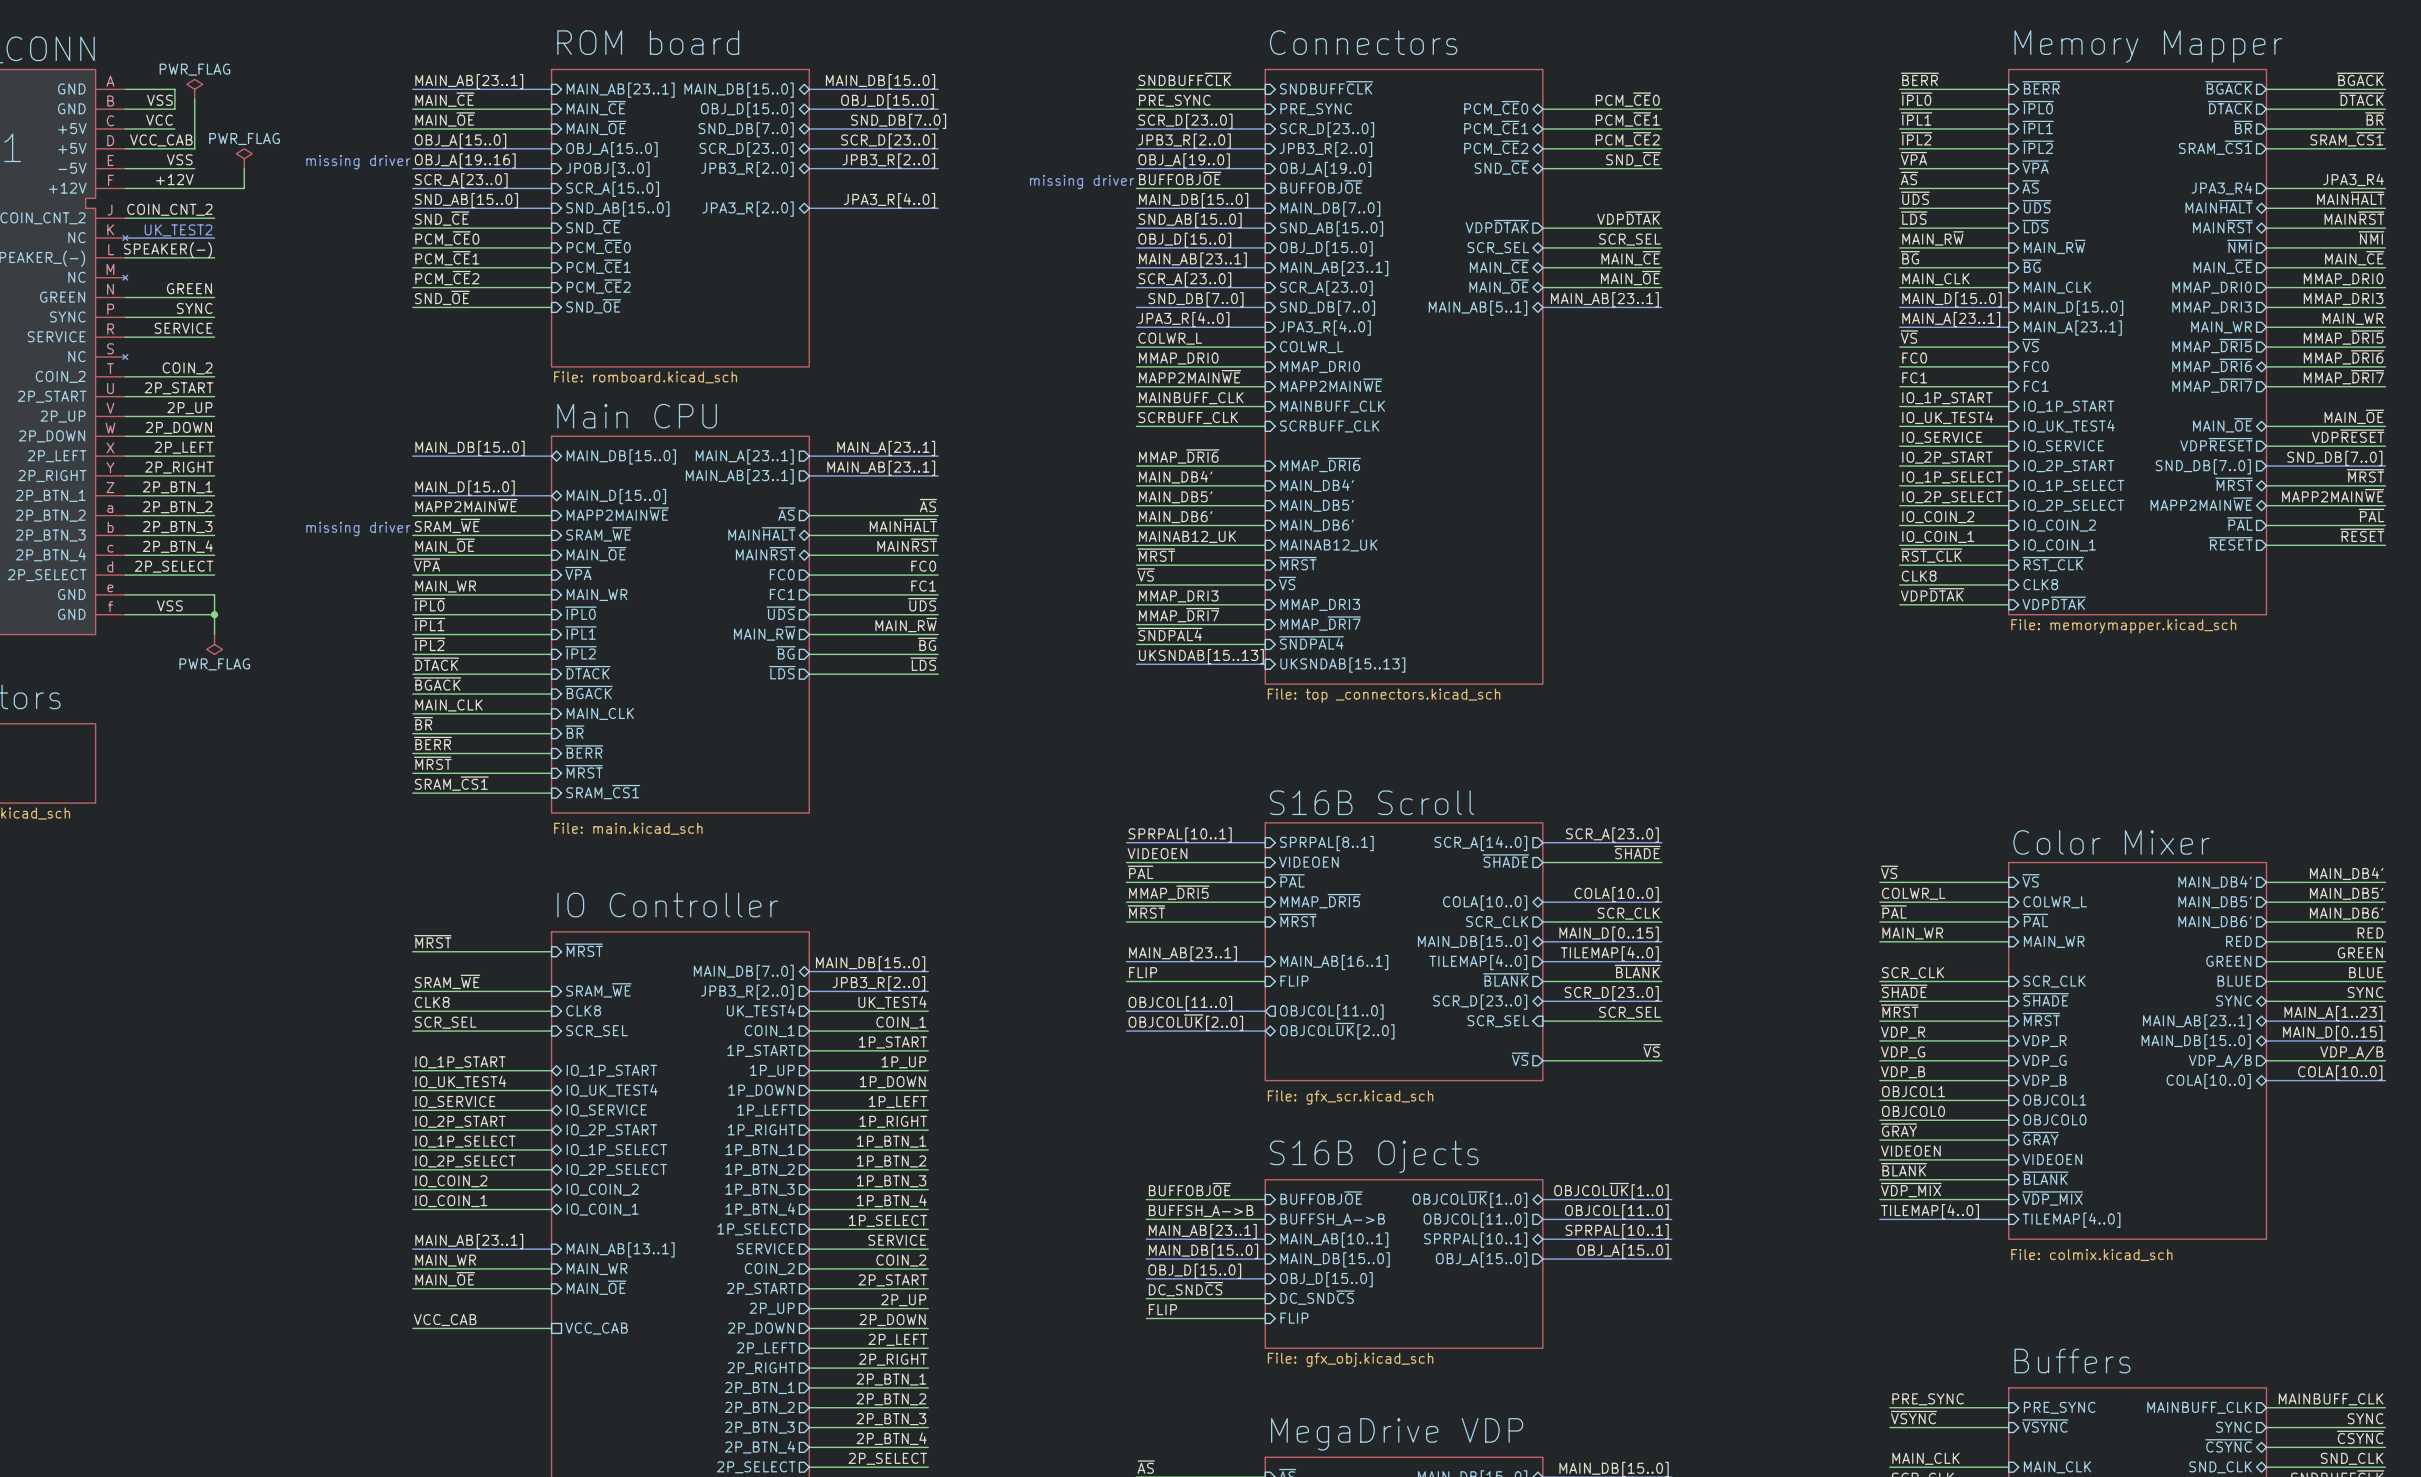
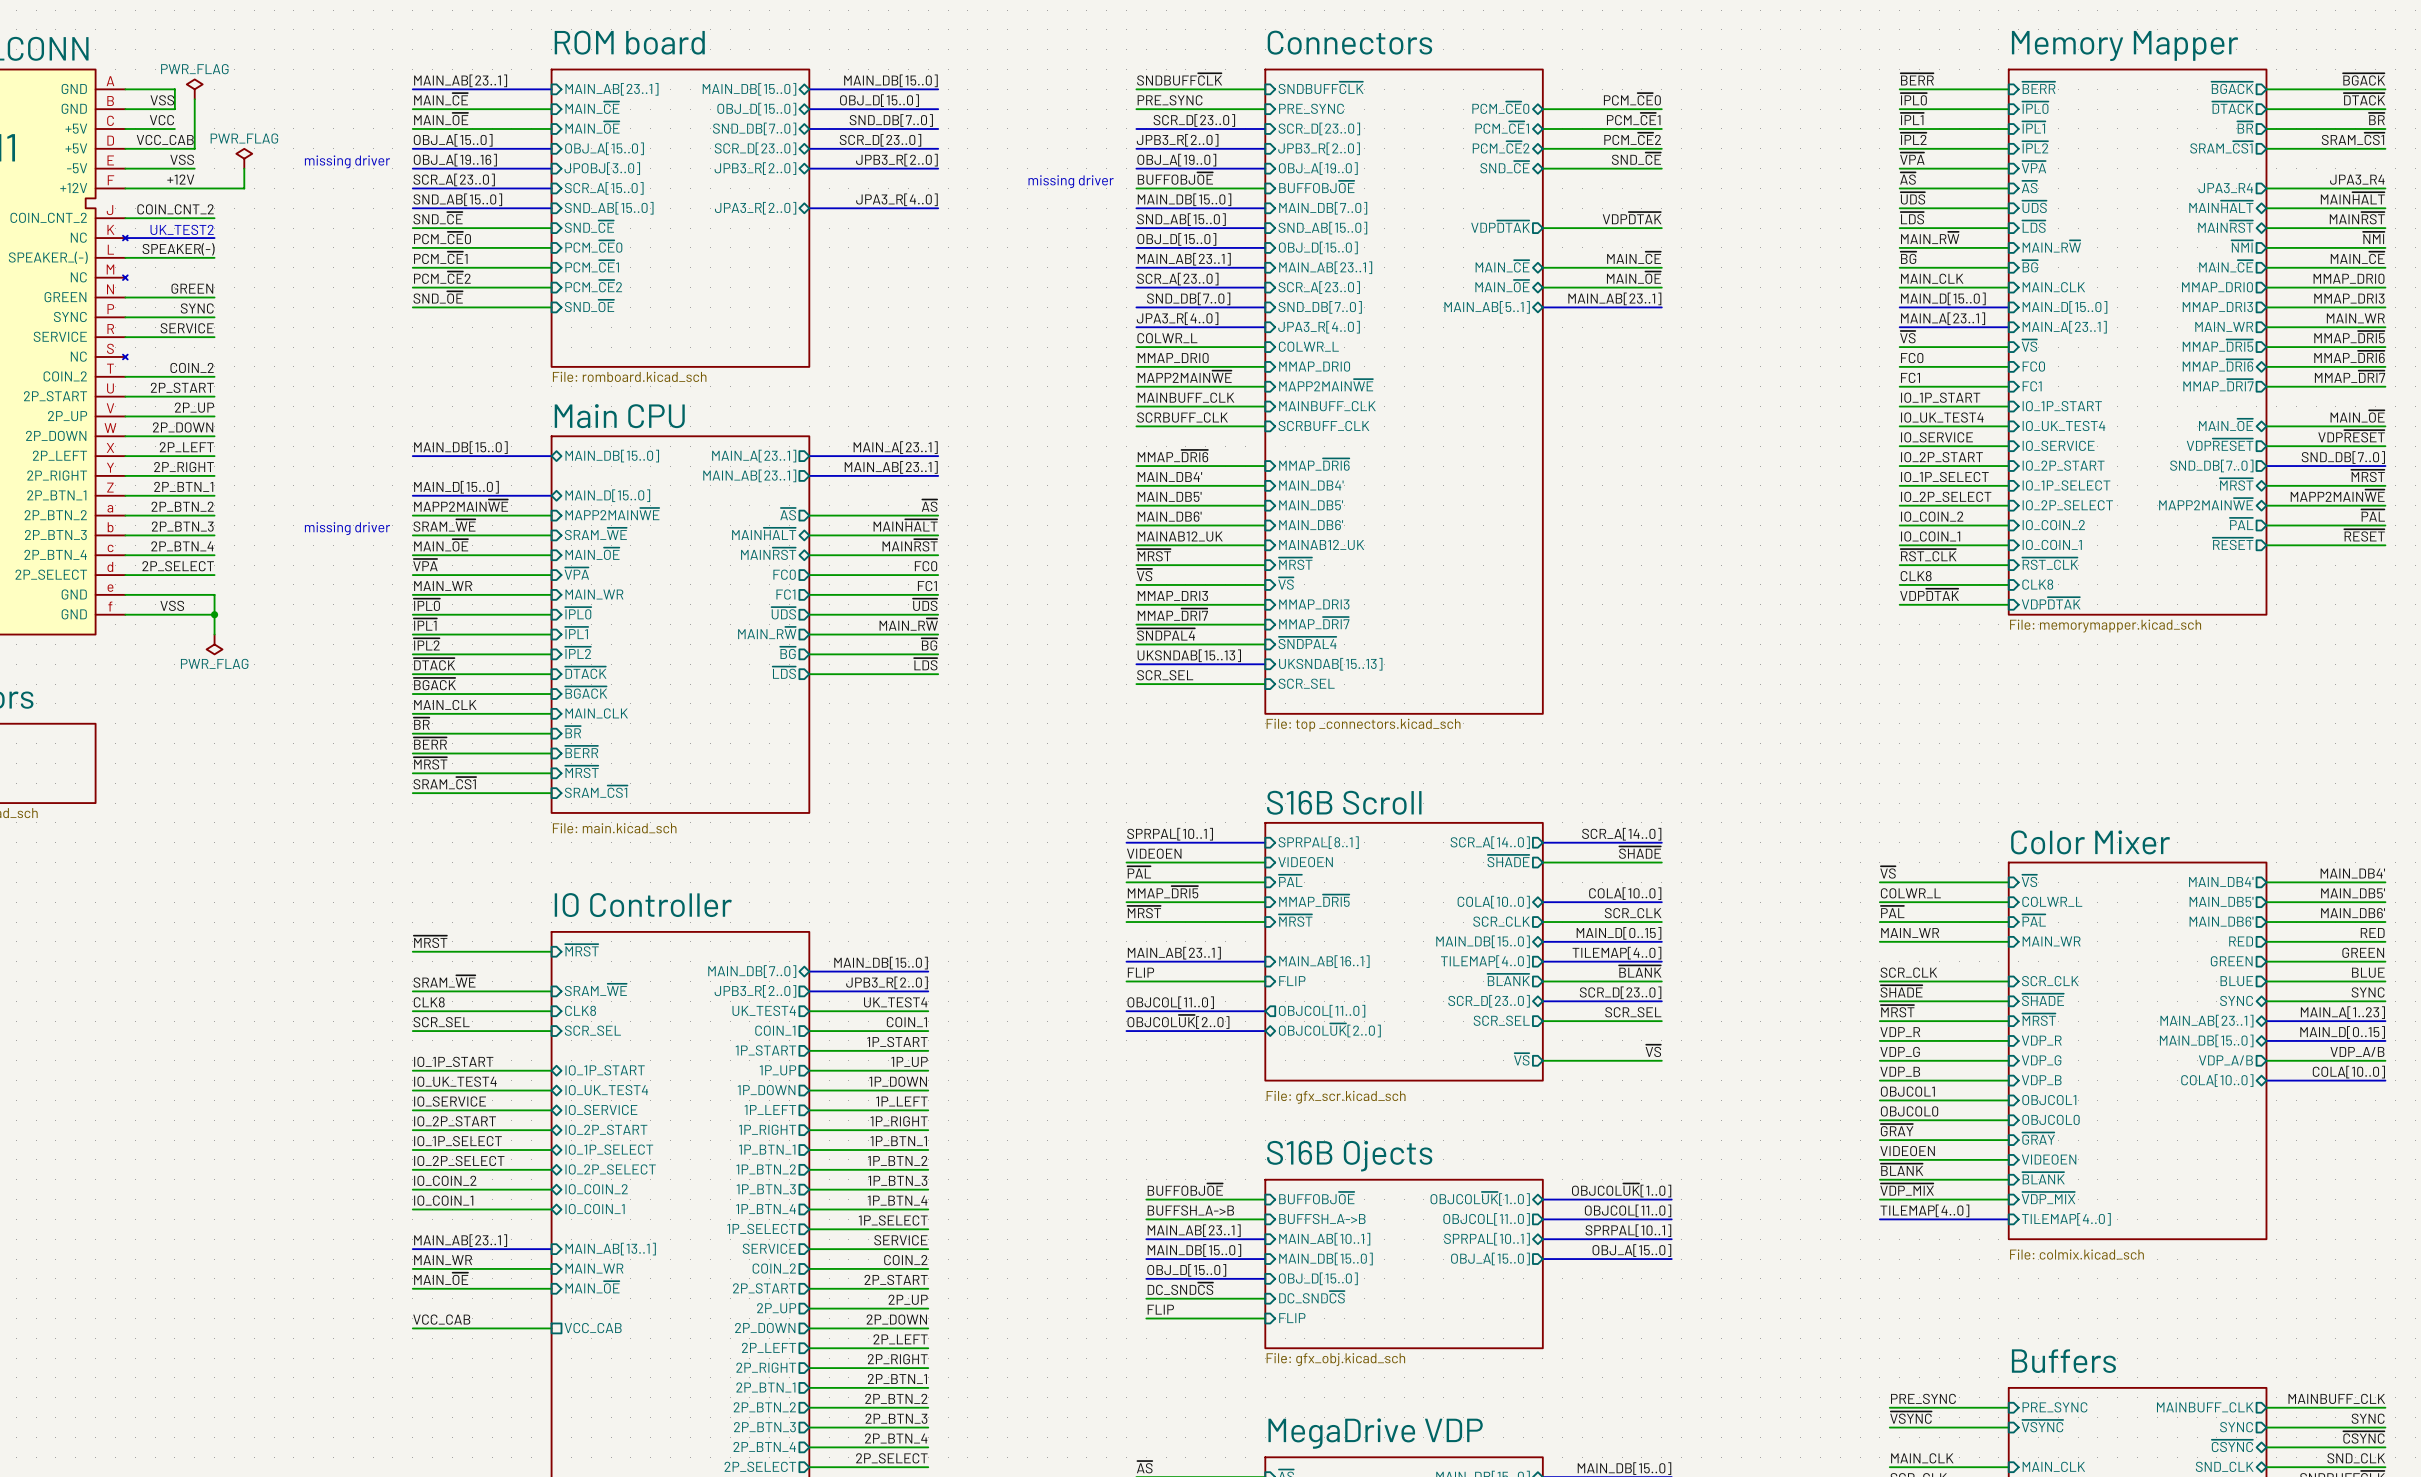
label: SCR_SEL (1629, 239) -> none
wire: (1542, 247) (1661, 247) -> none
sheet pin: SCR_SEL (1498, 248) -> none
sheet Connectors: File: top _connectors.kicad_sch (1404, 376) -> none
sheet Connectors: none -> File: top _connectors.kicad_sch (1404, 391)
label: none -> SCR_SEL (1165, 675)
wire: none -> (1136, 684) (1265, 684)
sheet pin: none -> SCR_SEL (1306, 683)
label: SCR_A[23..0] (1612, 835) -> SCR_A[14..0] (1621, 834)
sheet pin shape: input (1498, 1021) -> output (1501, 1020)

